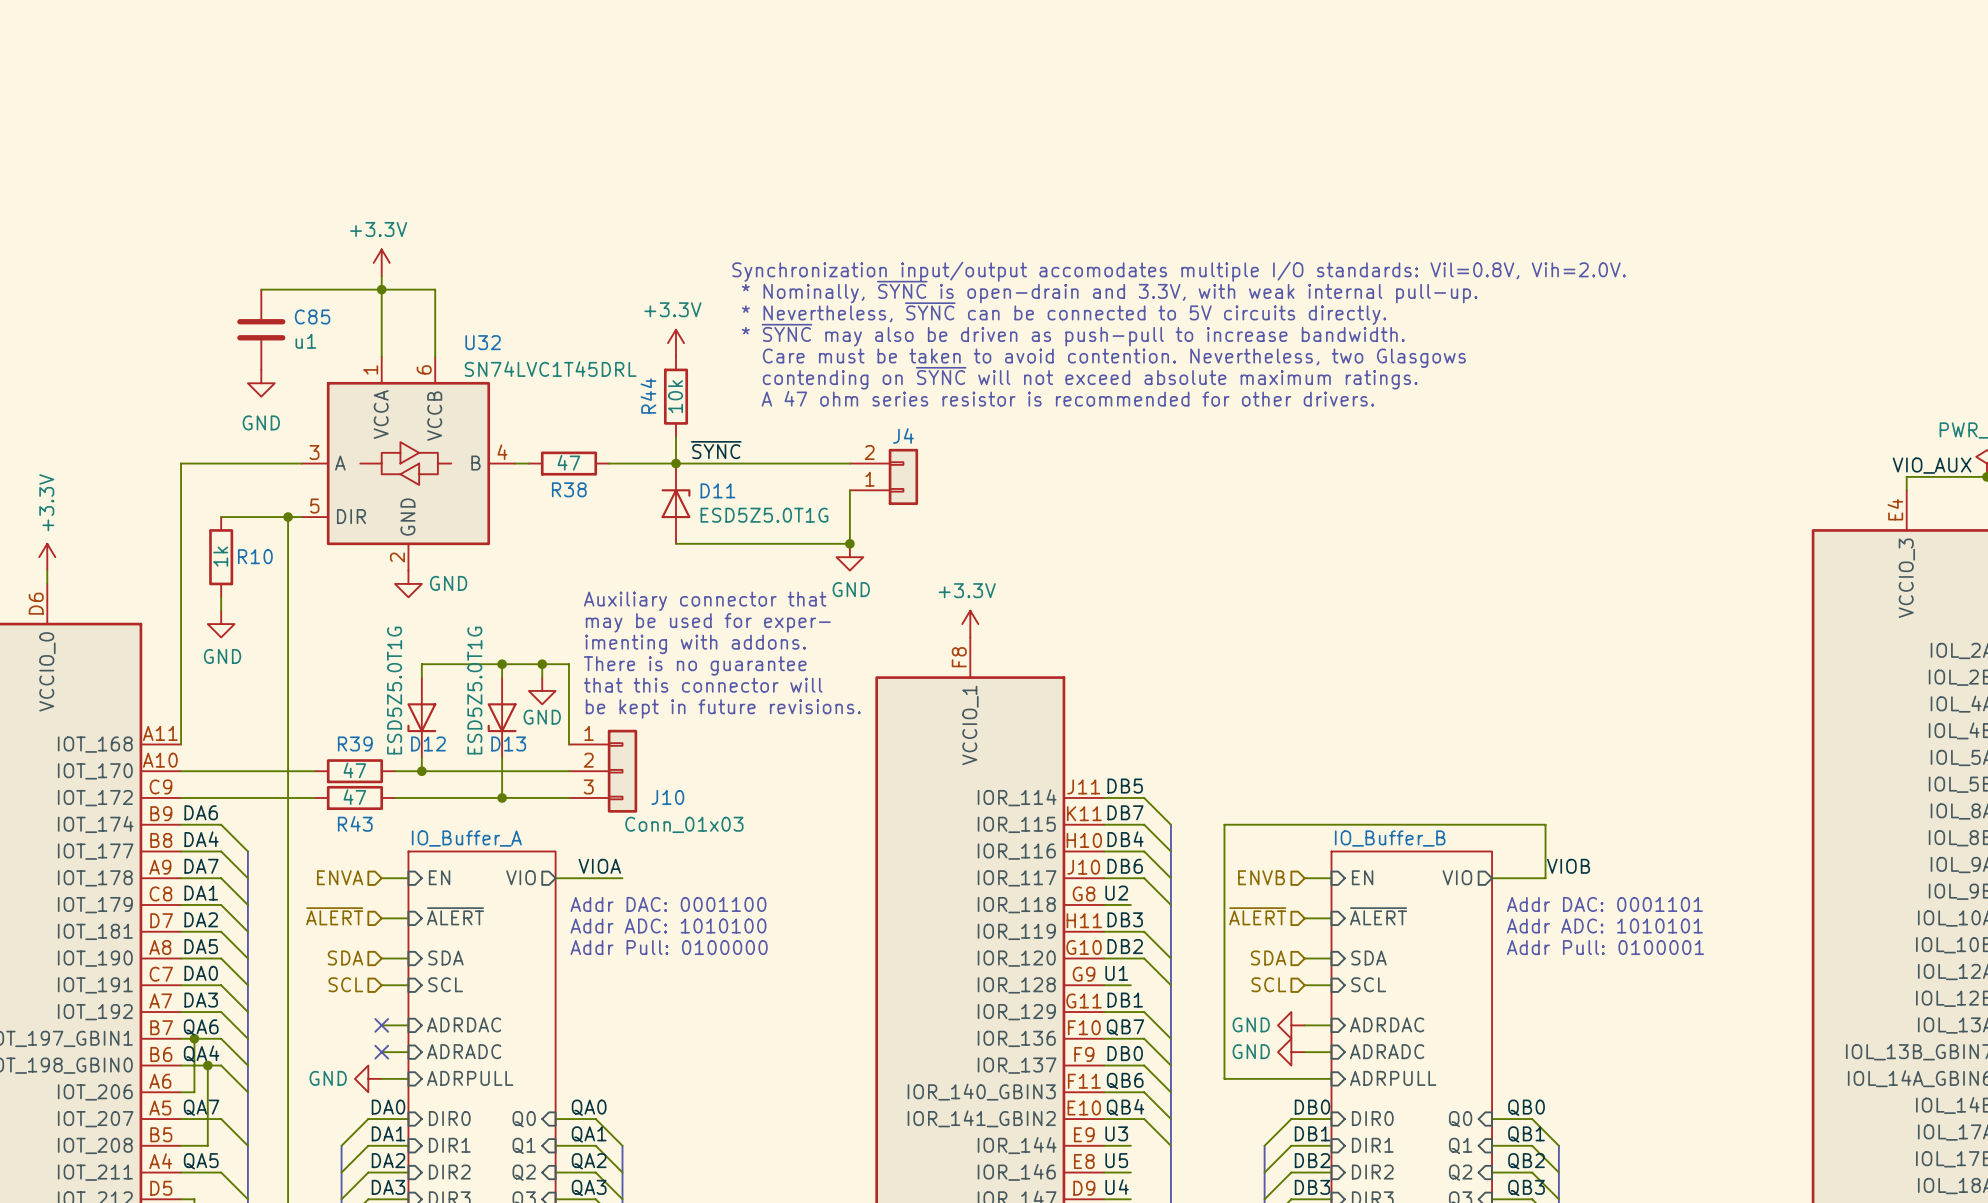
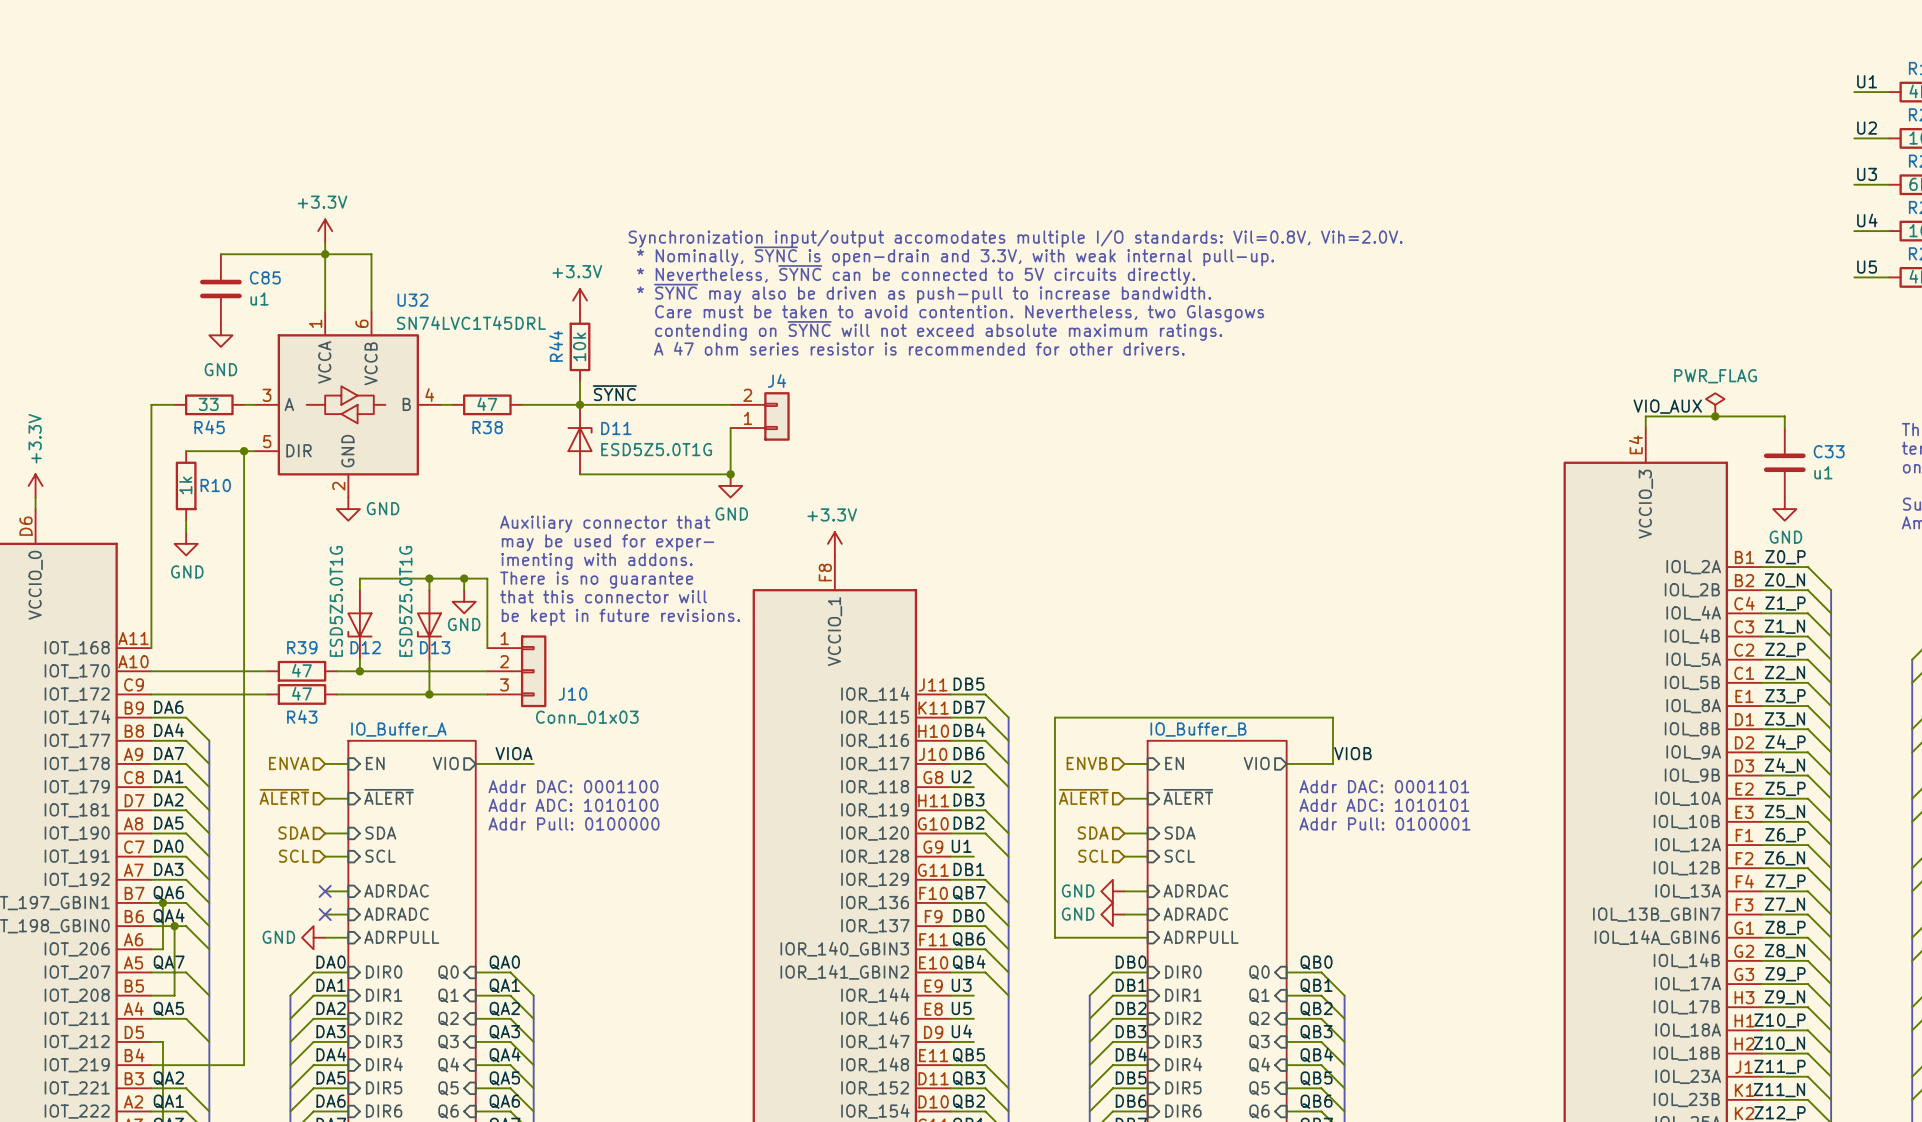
wire: (207, 463) (288, 463) -> none
R45: none -> 33 (209, 404)

